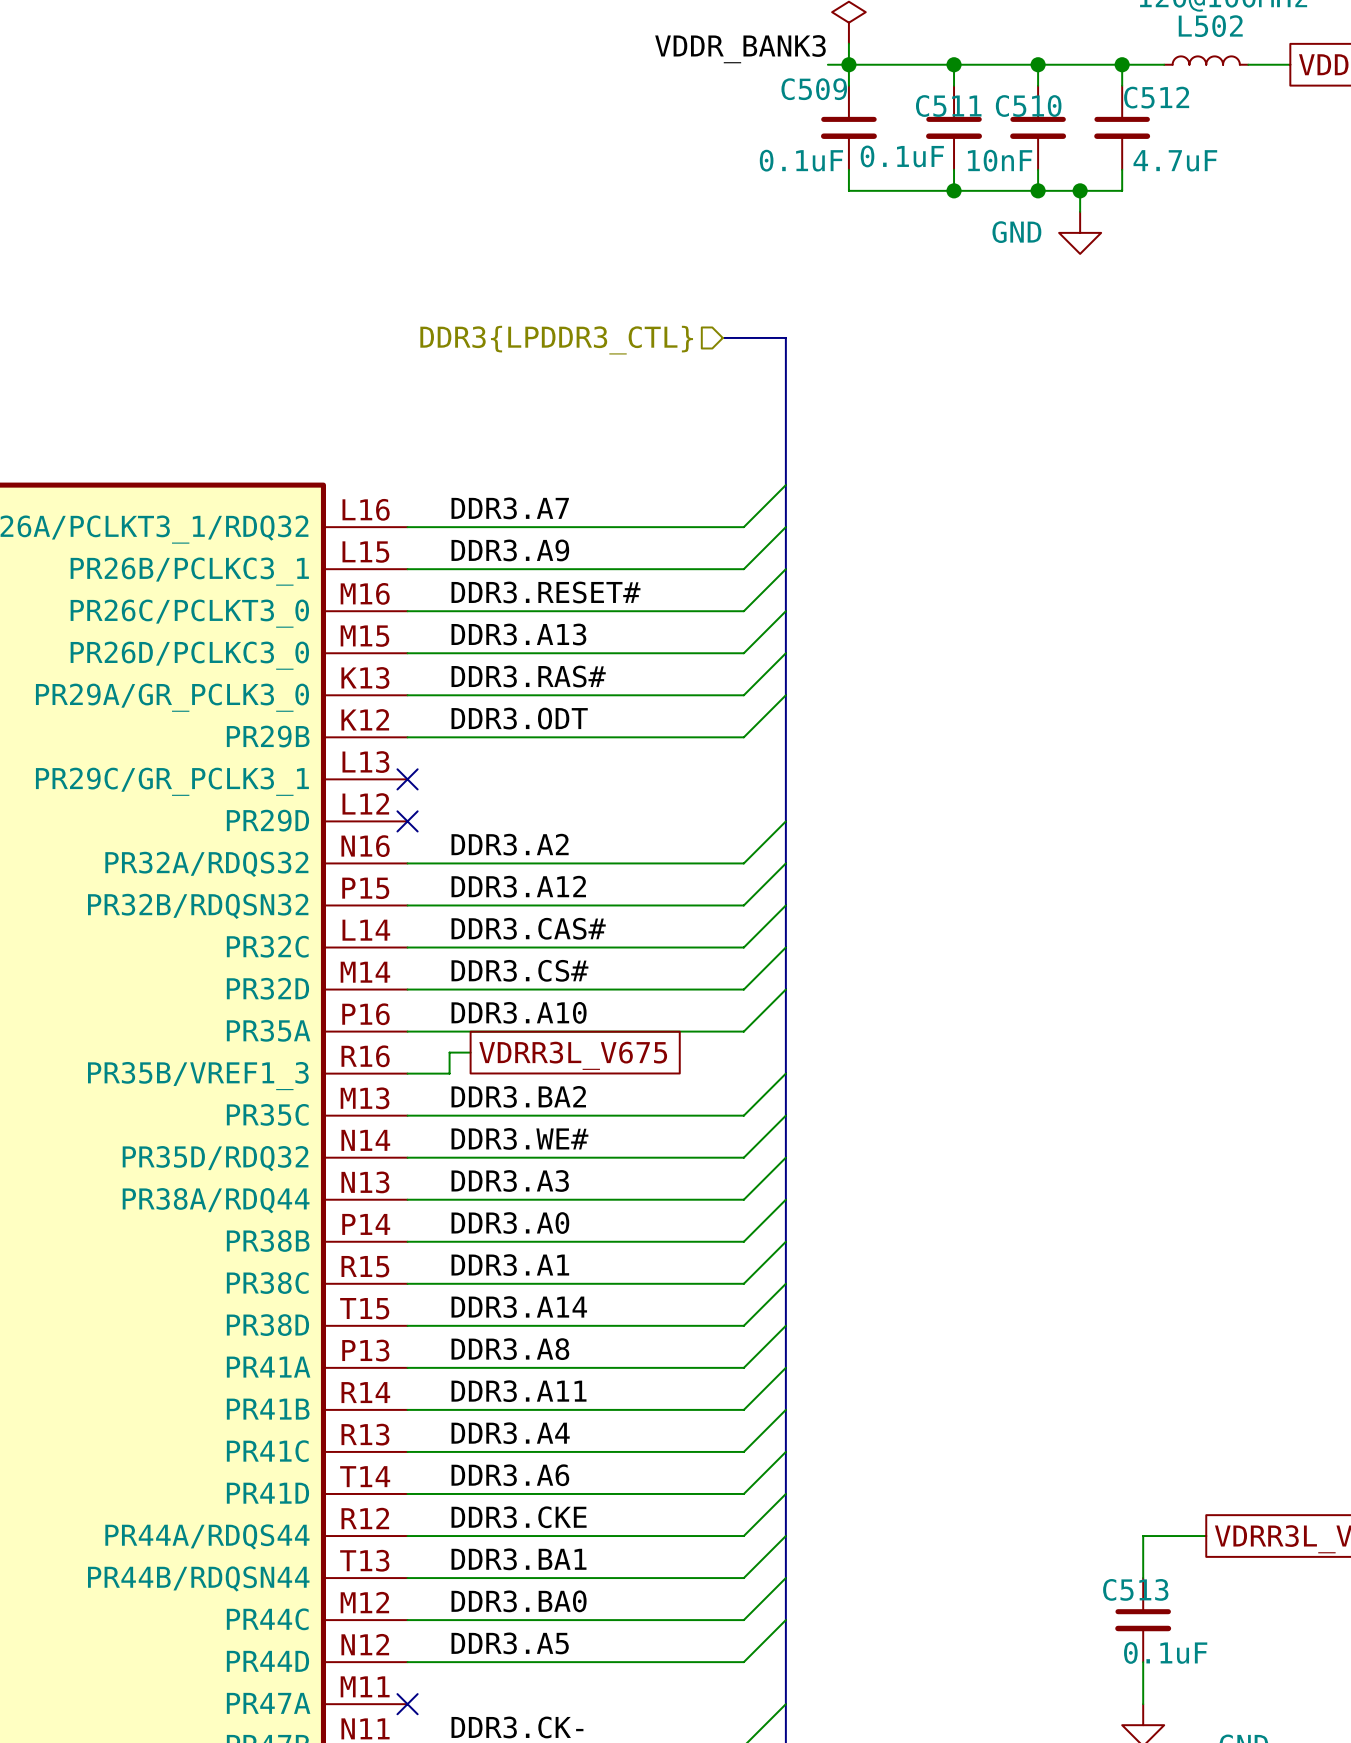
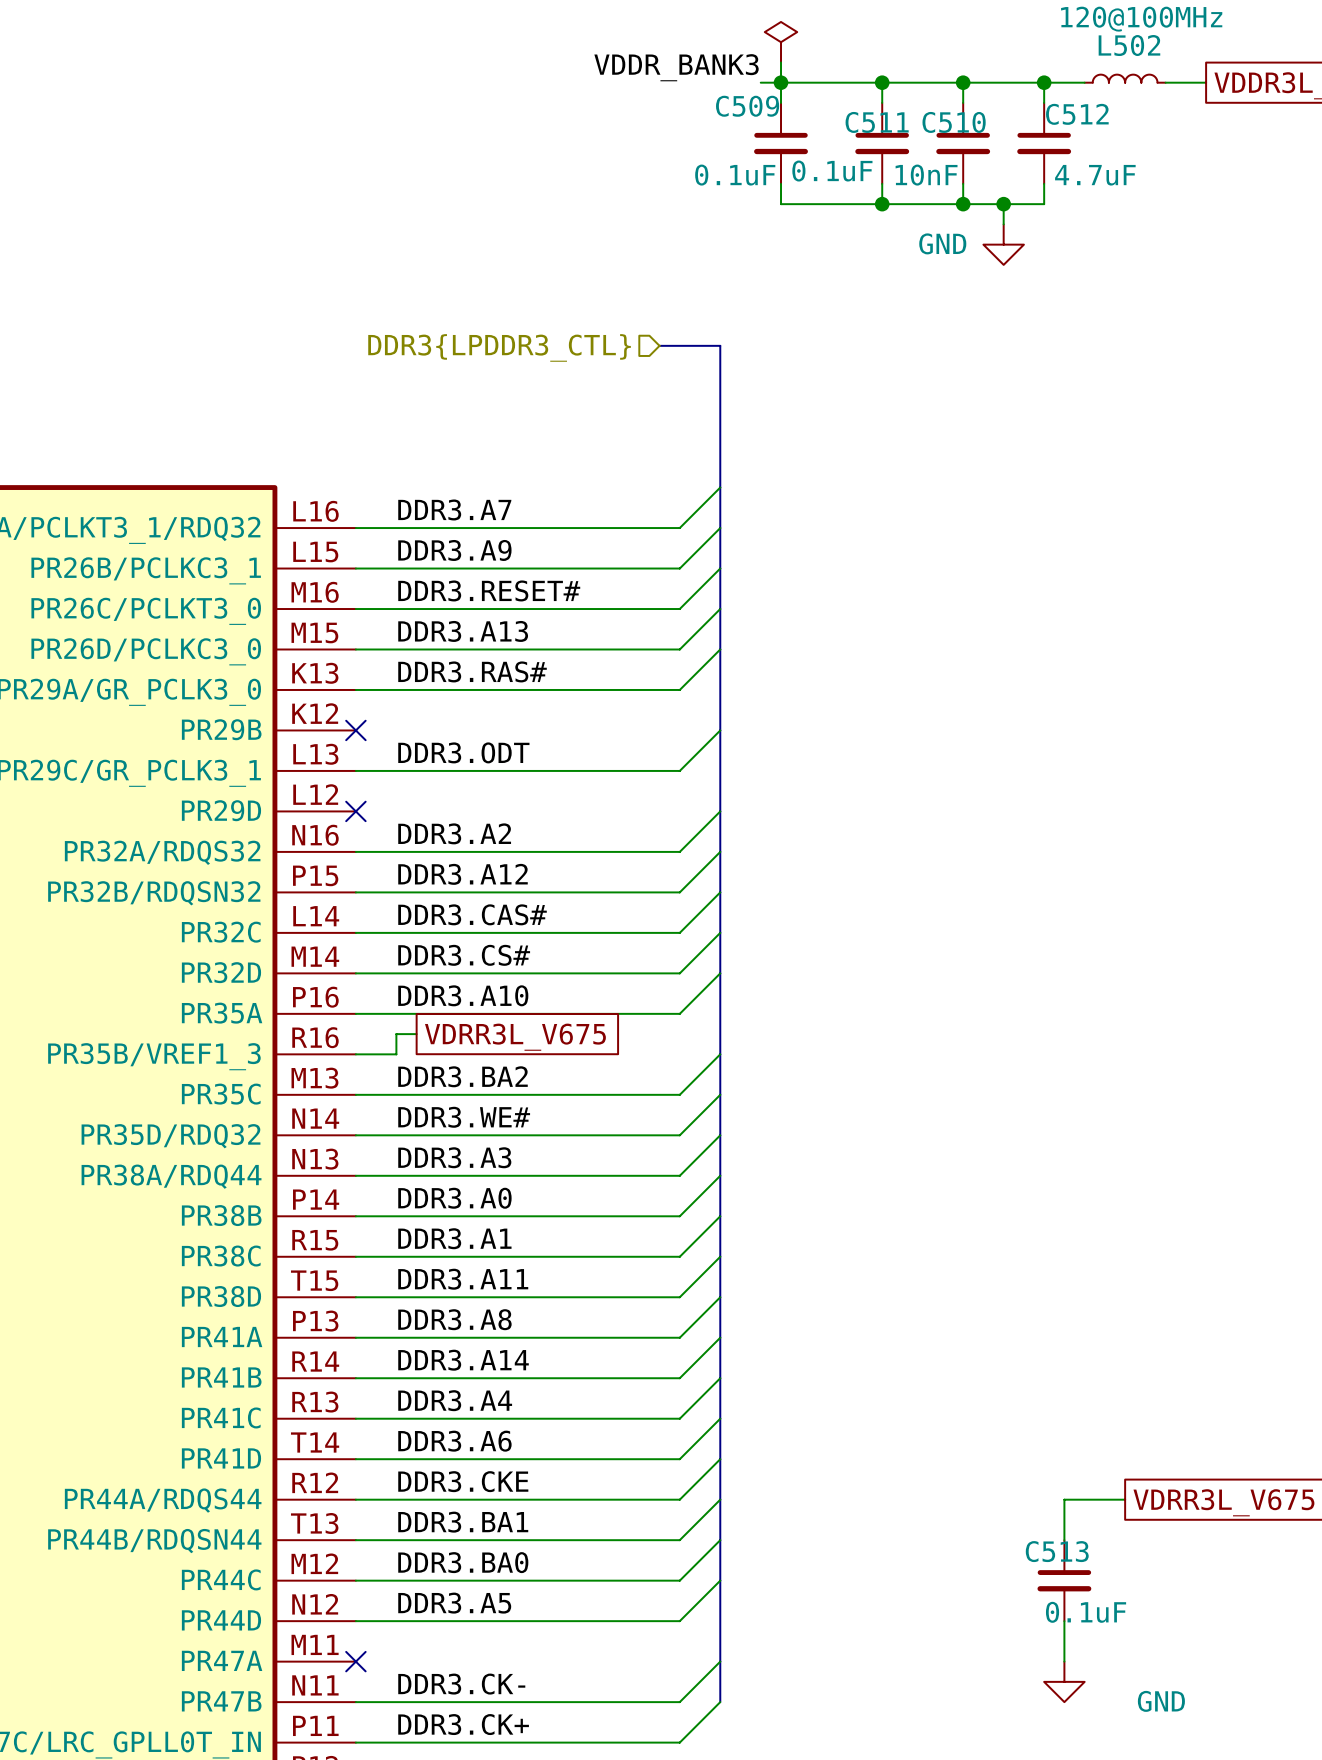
wire: (785, 695) (743, 737) (407, 737) -> (720, 730) (679, 770) (355, 770)
label position: DDR3.ODT (519, 718) -> DDR3.ODT (463, 752)
no-connect mark position: (407, 779) -> (355, 730)
label: DDR3.A14 (519, 1307) -> DDR3.A11 (463, 1279)
label: DDR3.A11 (519, 1391) -> DDR3.A14 (463, 1360)

